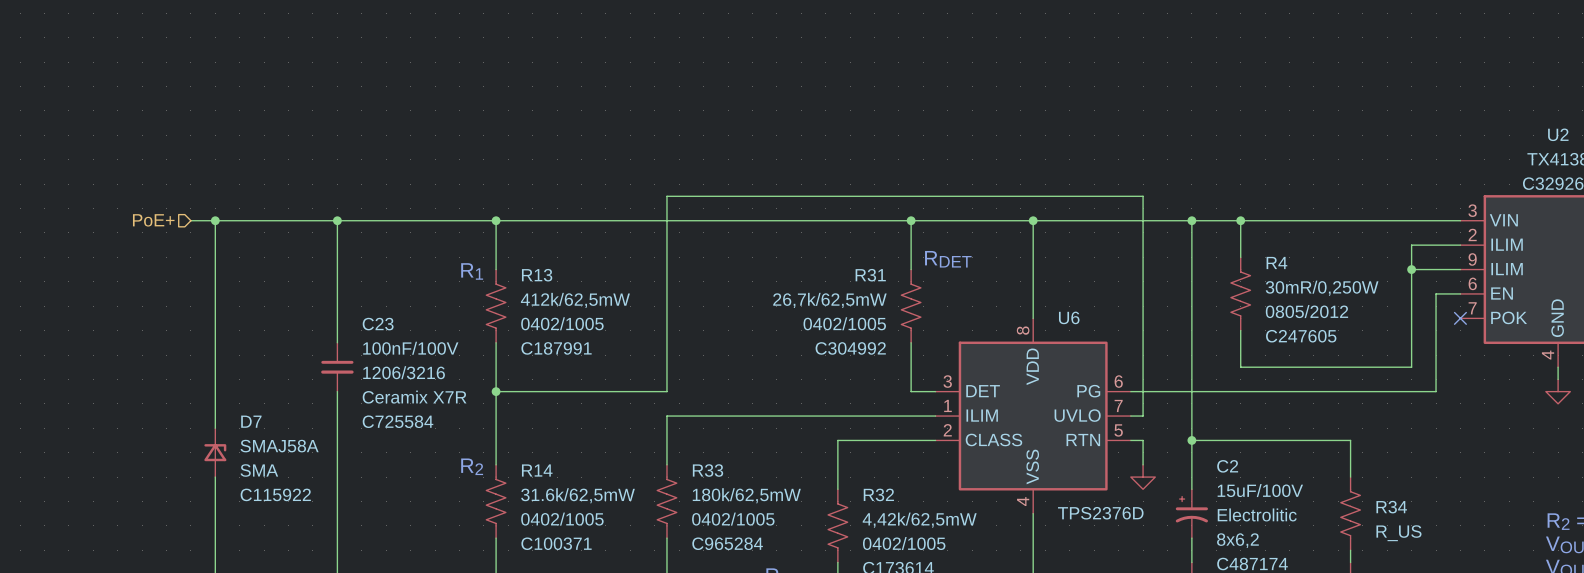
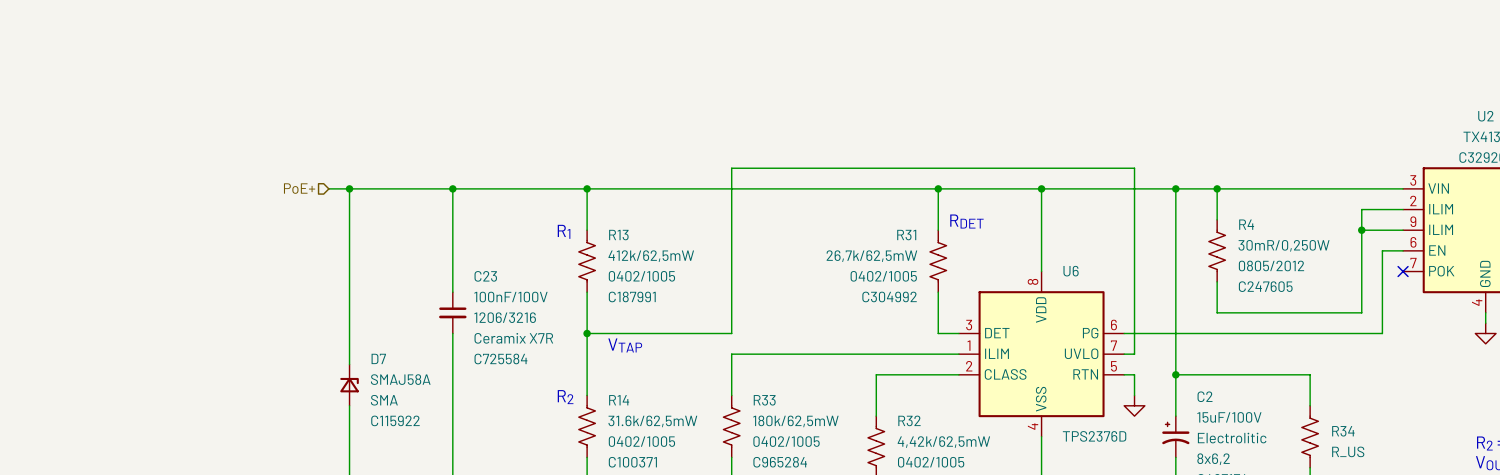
text: none -> VTAP (625, 345)

